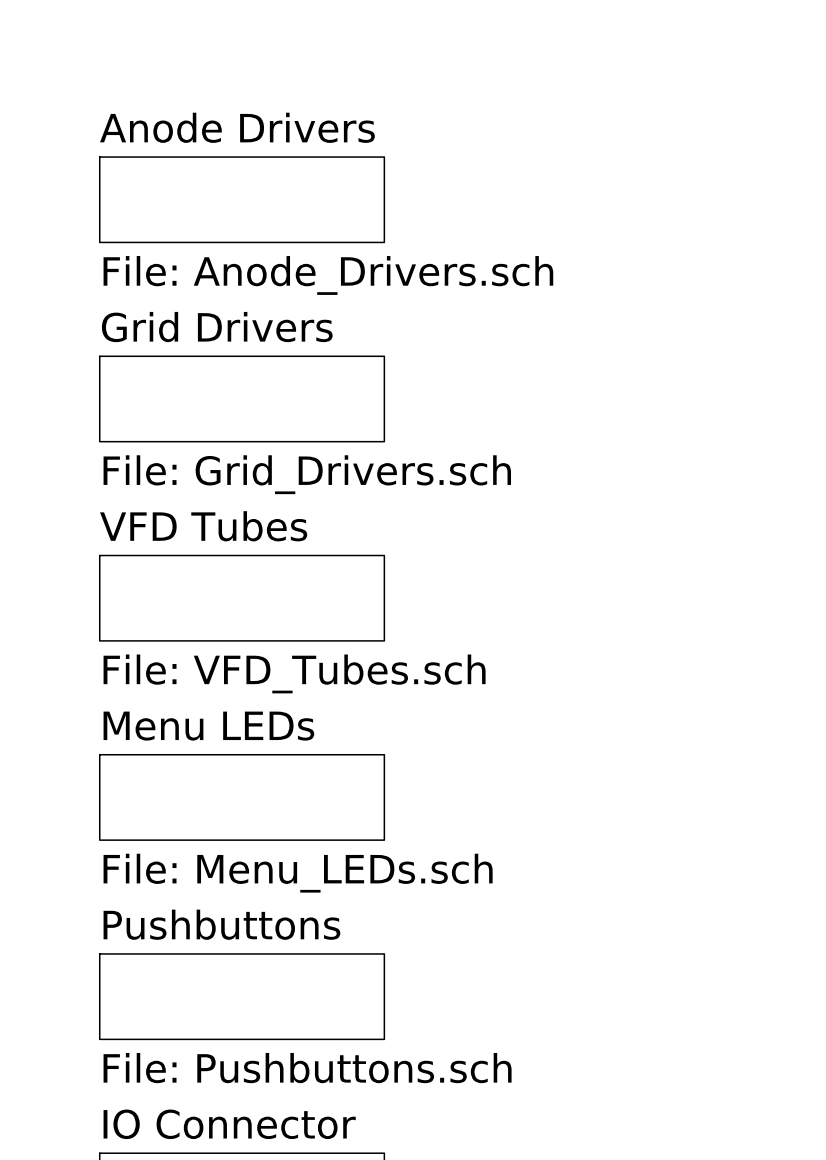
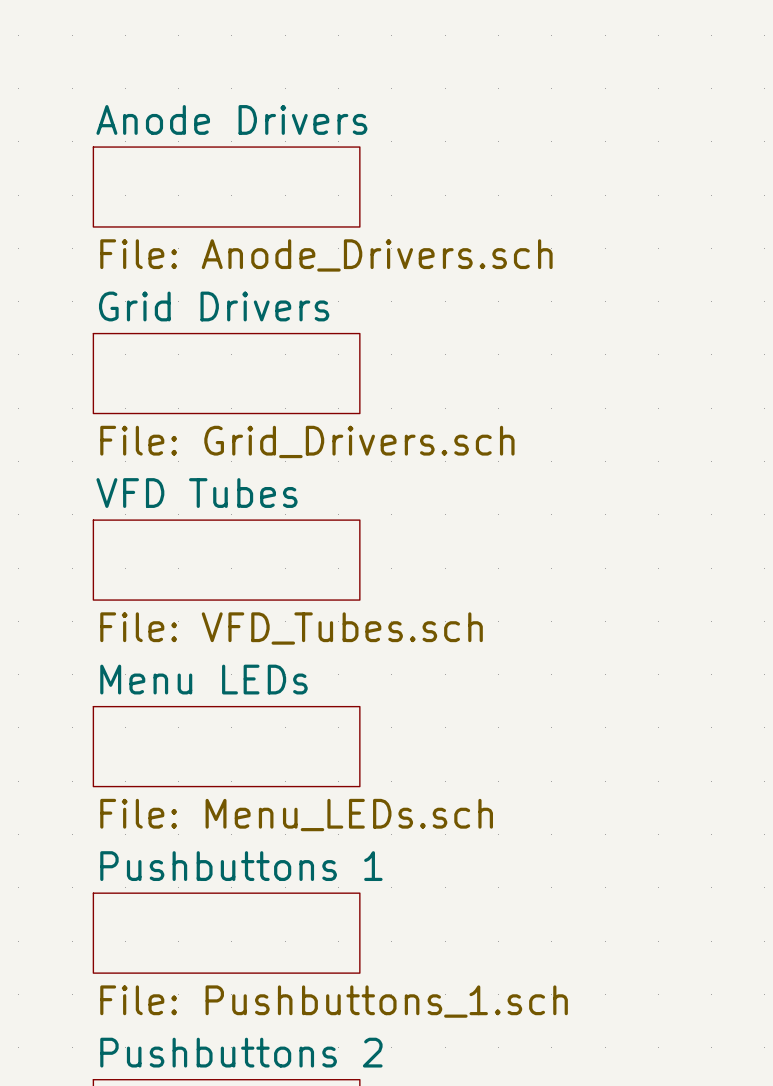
sheet Pushbuttons name: Pushbuttons (221, 924) -> Pushbuttons 1 (241, 866)
sheet Pushbuttons value: File: Pushbuttons.sch (307, 1068) -> File: Pushbuttons_1.sch (334, 1001)
sheet IO Connector name: IO Connector (229, 1124) -> Pushbuttons 2 (241, 1052)

